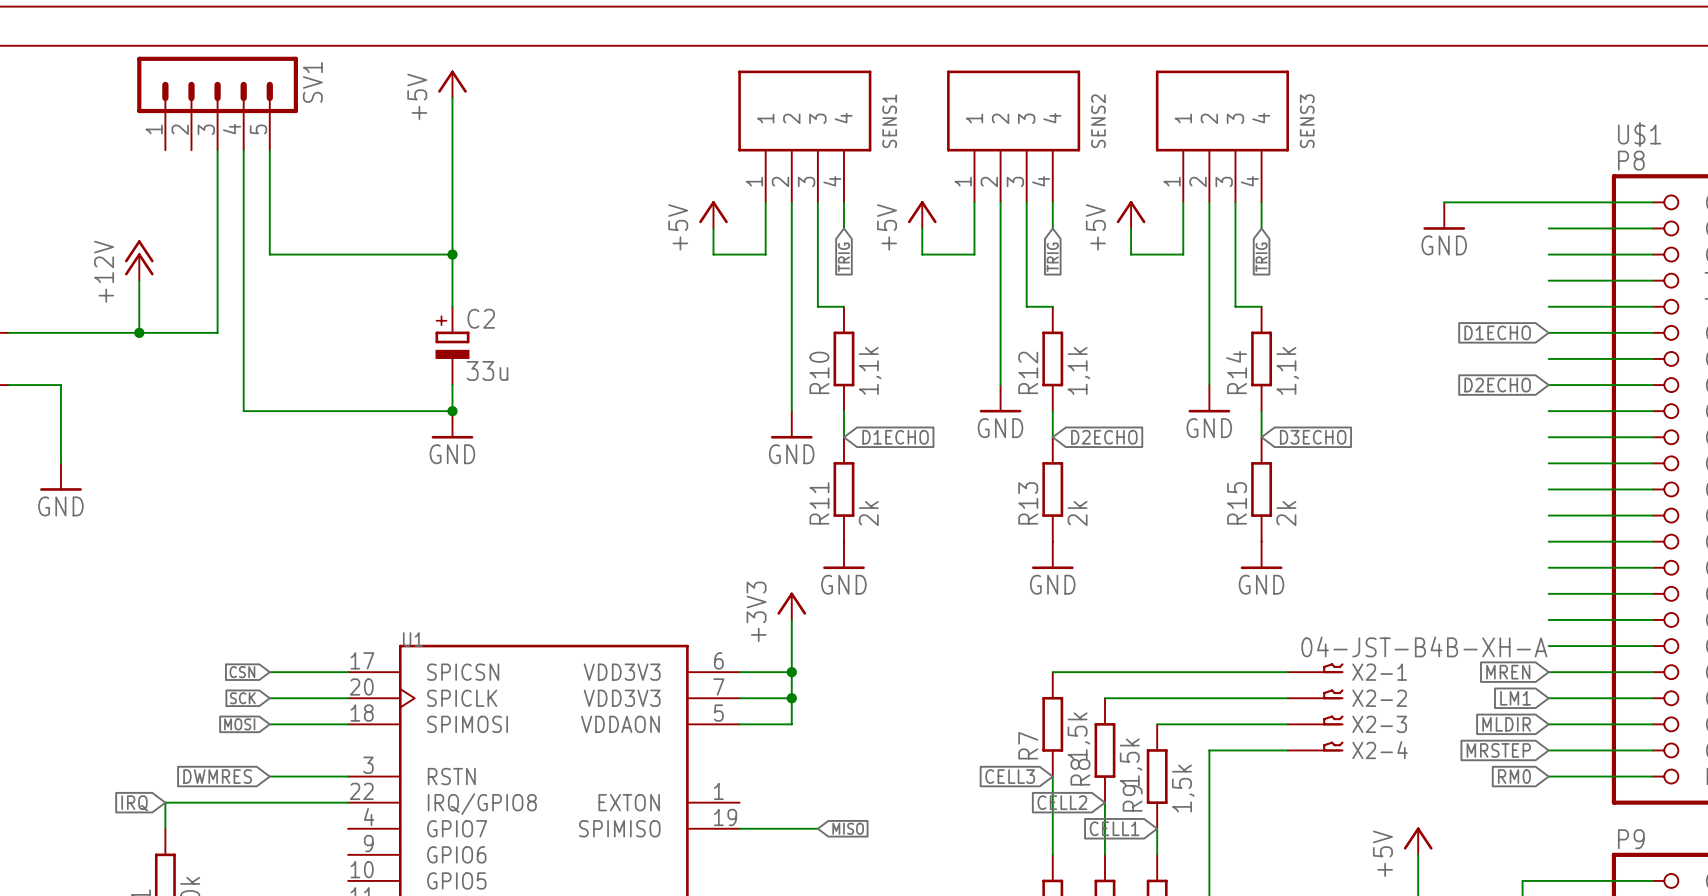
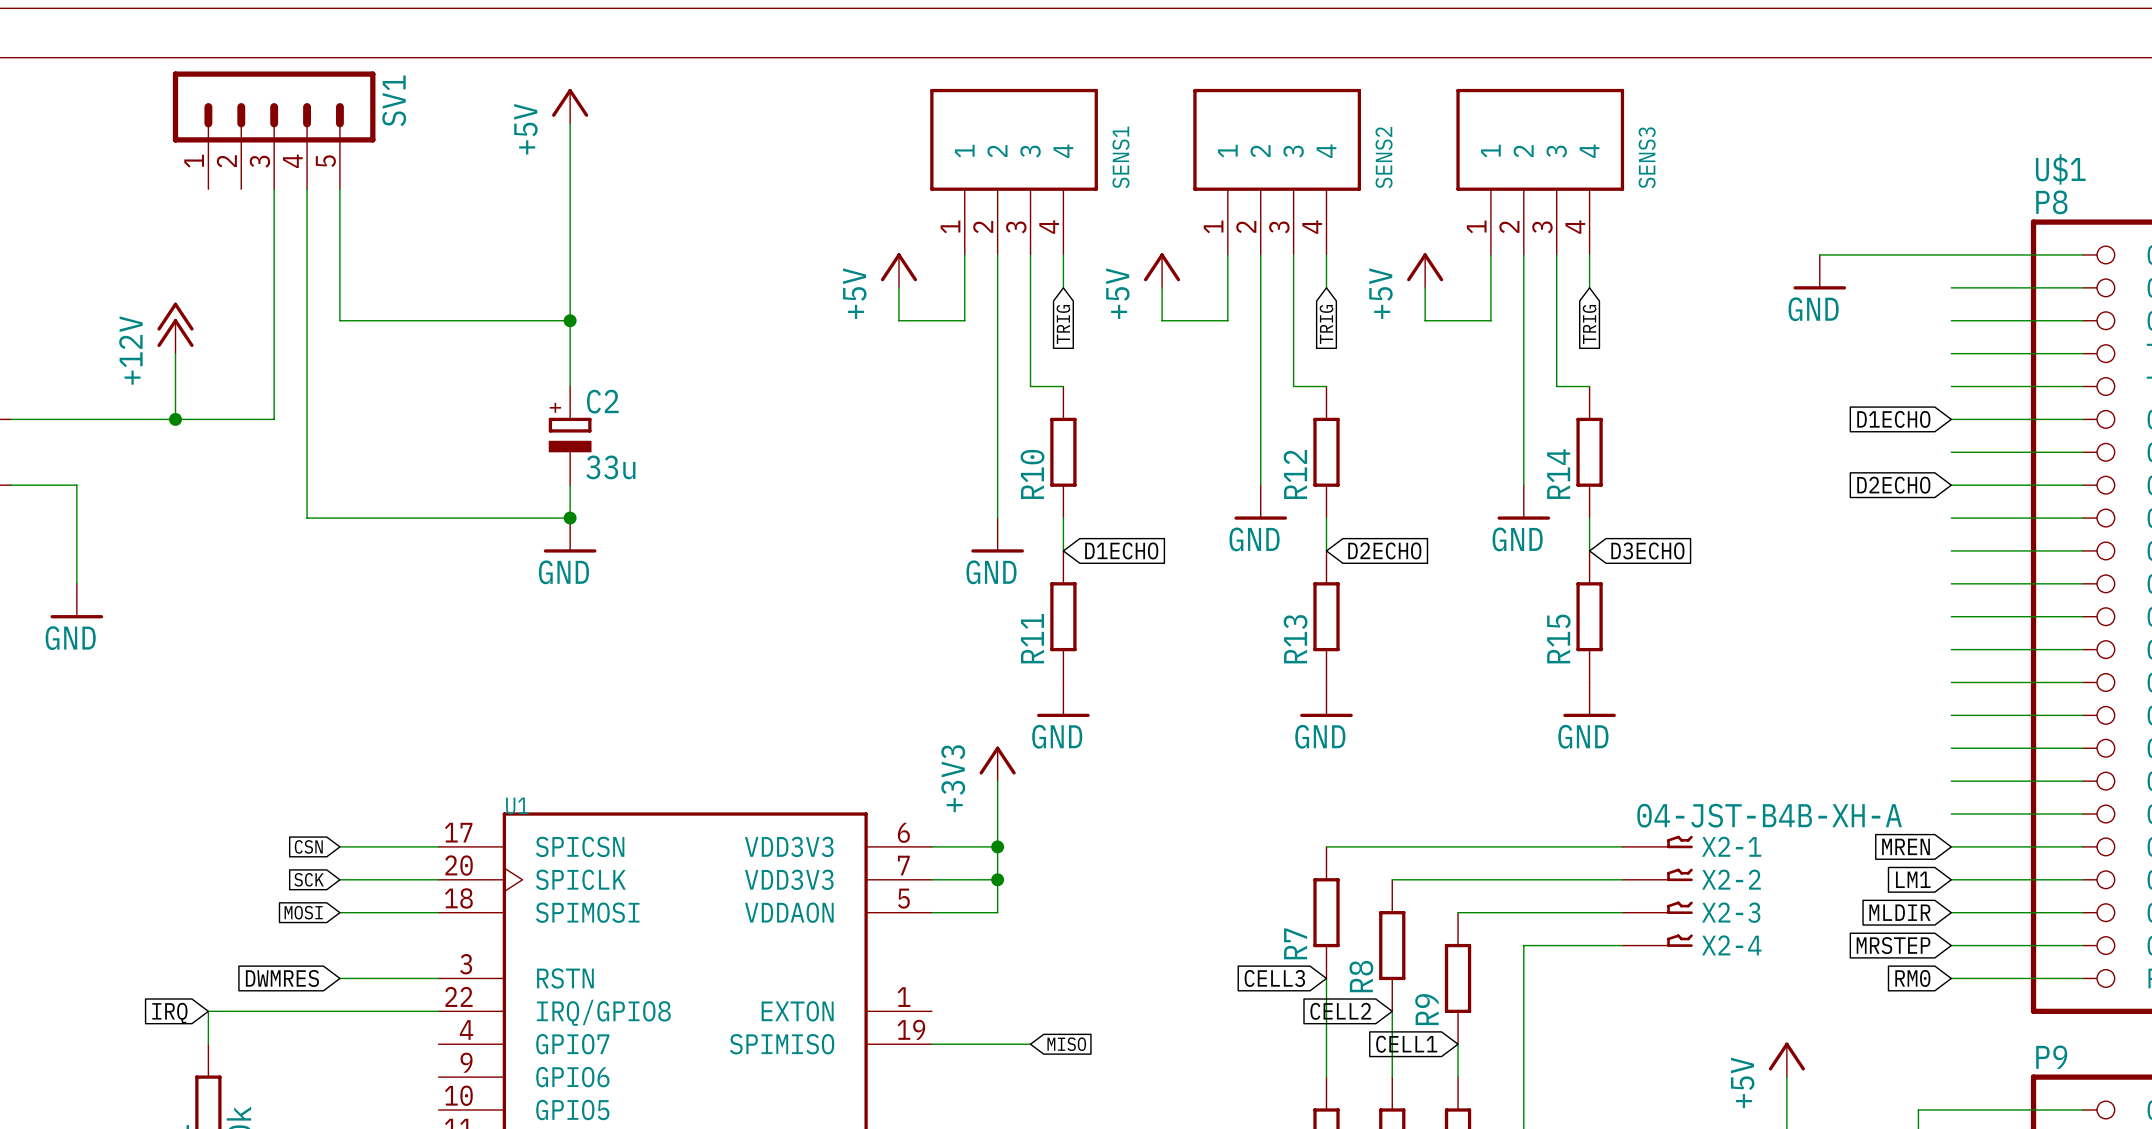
R10 value: 1,1k (870, 370) -> none
R12 value: 1,1k (1078, 370) -> none
R14 value: 1,1k (1287, 370) -> none
R11 value: 2k (868, 513) -> none
R13 value: 2k (1077, 513) -> none
R15 value: 2k (1286, 513) -> none
R7 value: 1,5k (1078, 736) -> none
R8 value: 1,5k (1131, 762) -> none
R9 value: 1,5k (1183, 788) -> none

